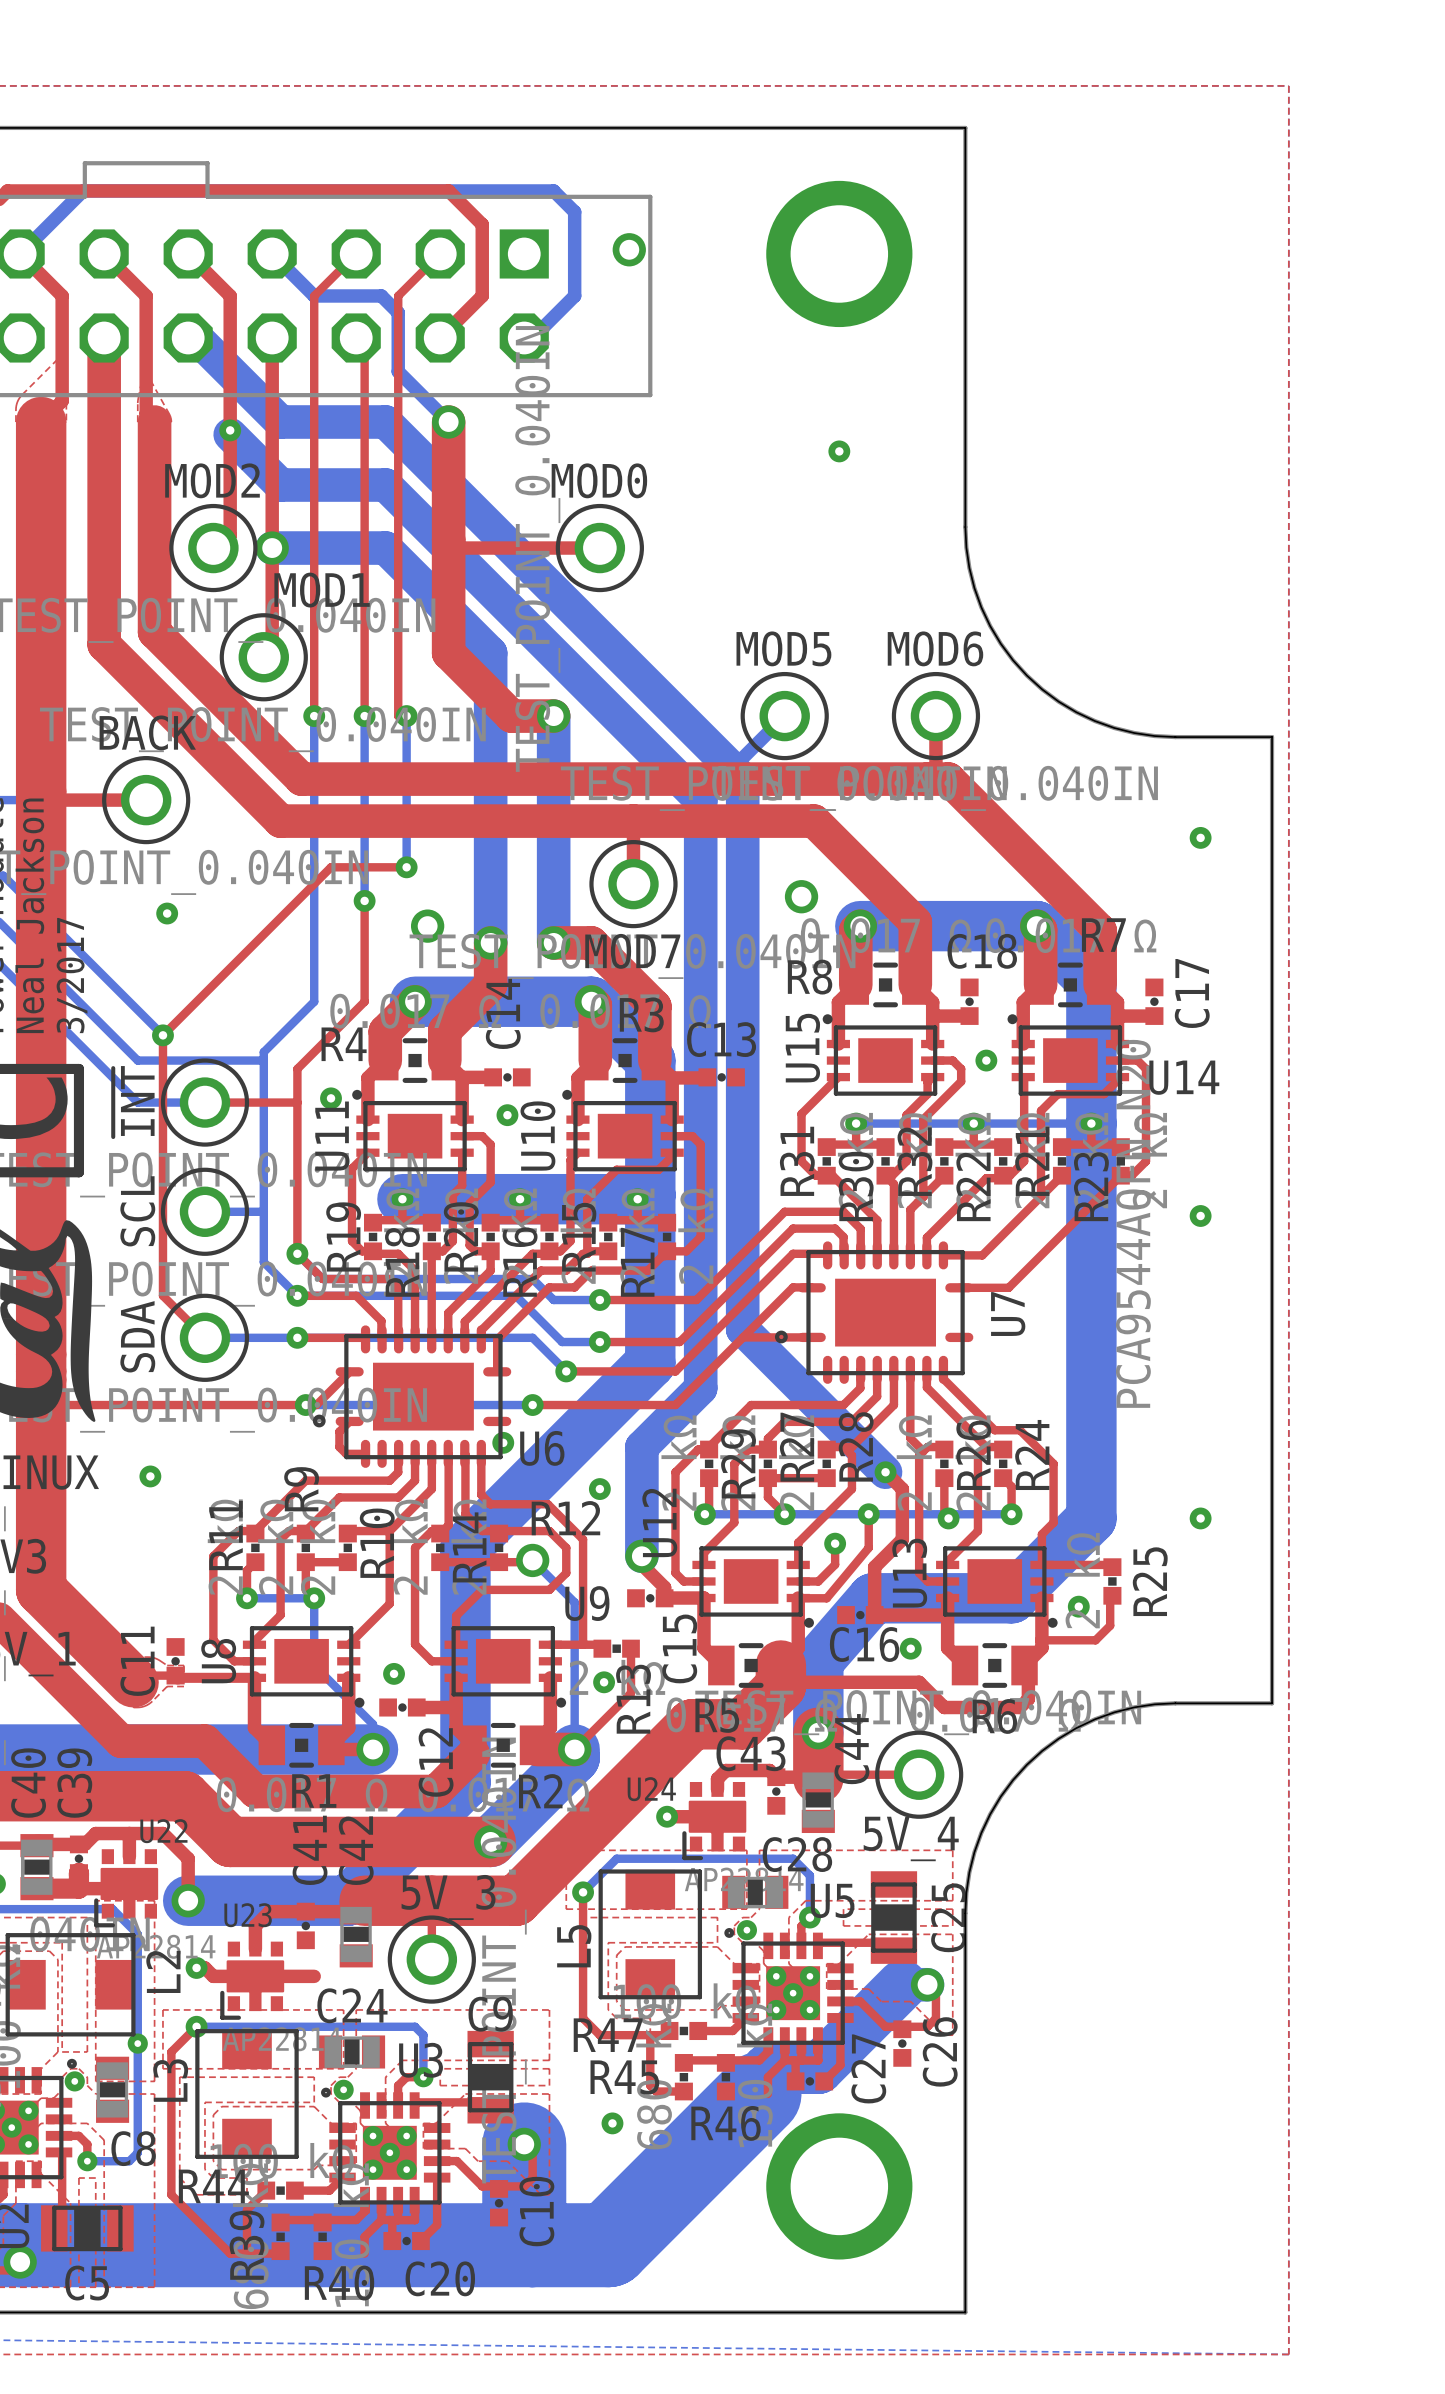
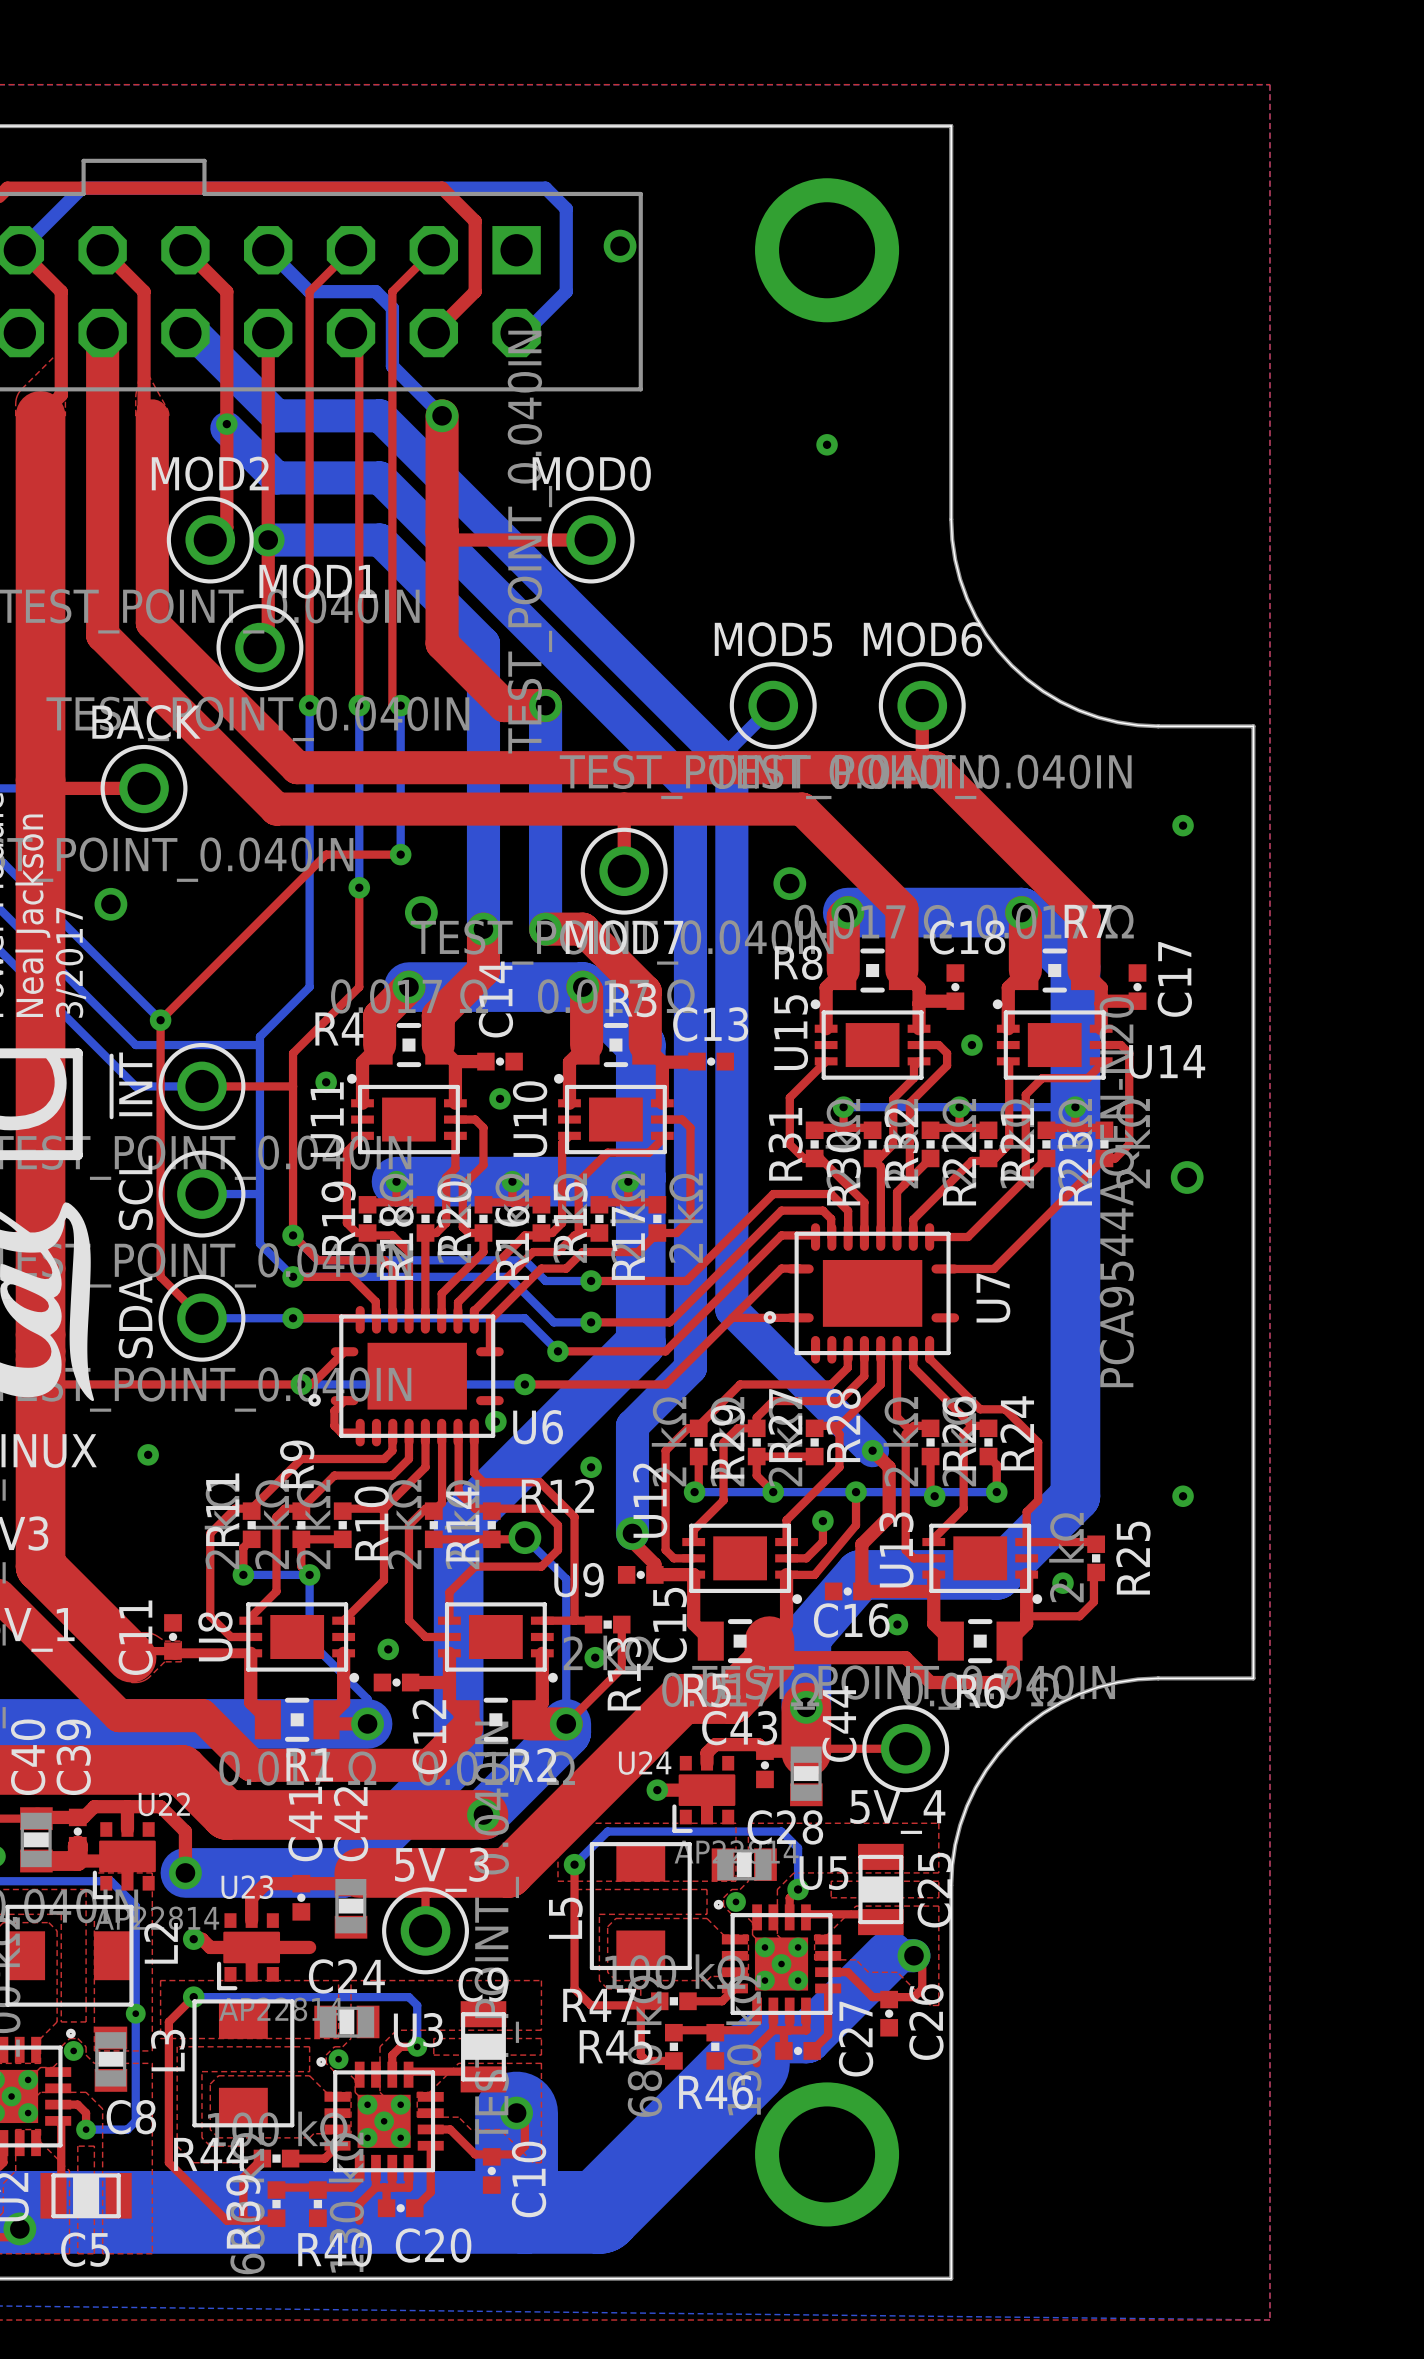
via: (167, 913) -> none
via: none -> (110, 904)
via size: [1189, 1205, 1212, 1227] -> [1170, 1161, 1204, 1194]
via: (612, 2123) -> none

